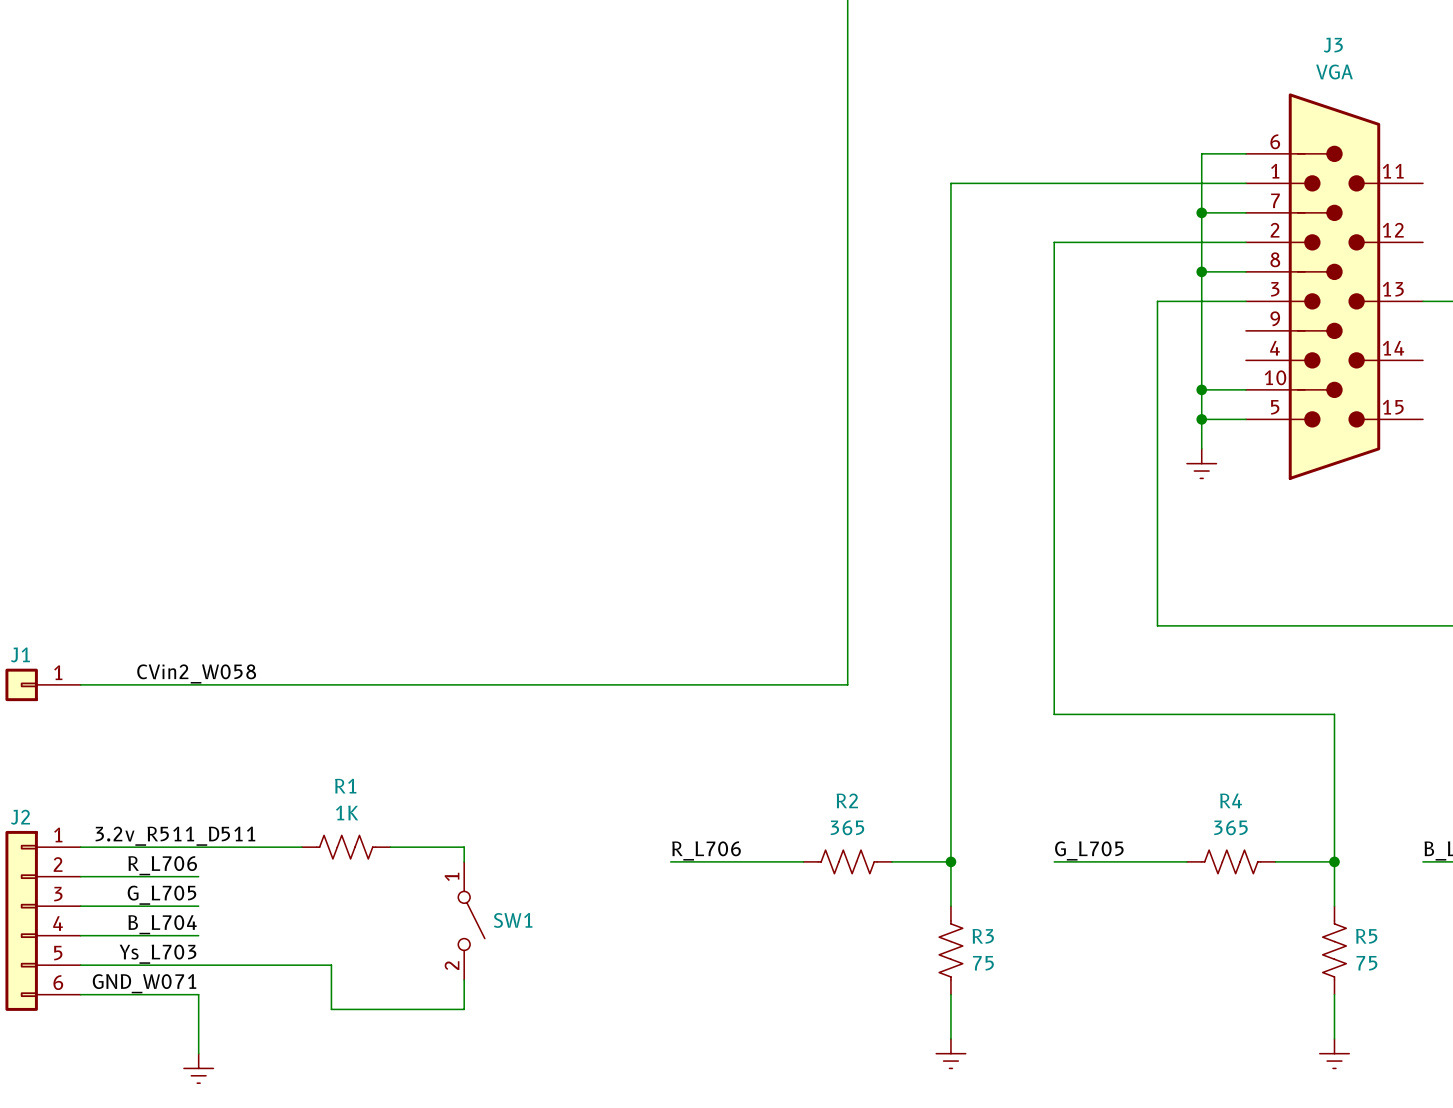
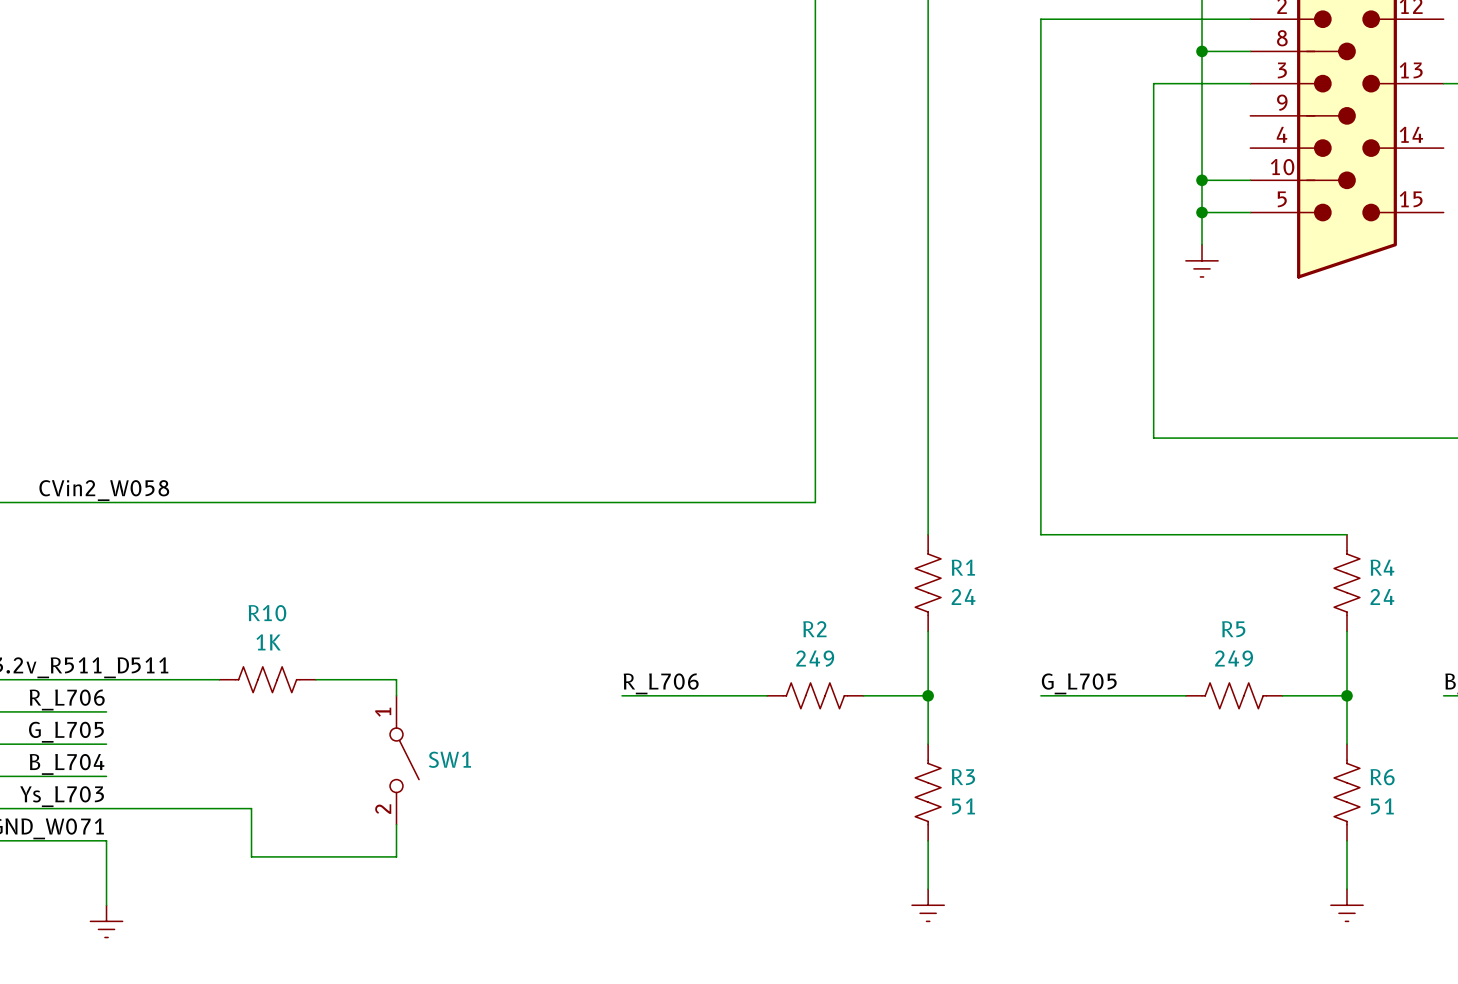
R1: none -> 24 (928, 583)
R4: none -> 24 (1346, 583)
R1 name: R1 (345, 786) -> R10 (267, 613)
R4 name: R4 (1231, 800) -> R5 (1233, 629)
R2 value: 365 (847, 827) -> 249 (815, 658)
R4 value: 365 (1230, 827) -> 249 (1234, 658)
R5 name: R5 (1366, 936) -> R6 (1382, 777)
R3 value: 75 (983, 963) -> 51 (963, 806)
R5 value: 75 (1366, 963) -> 51 (1382, 806)

